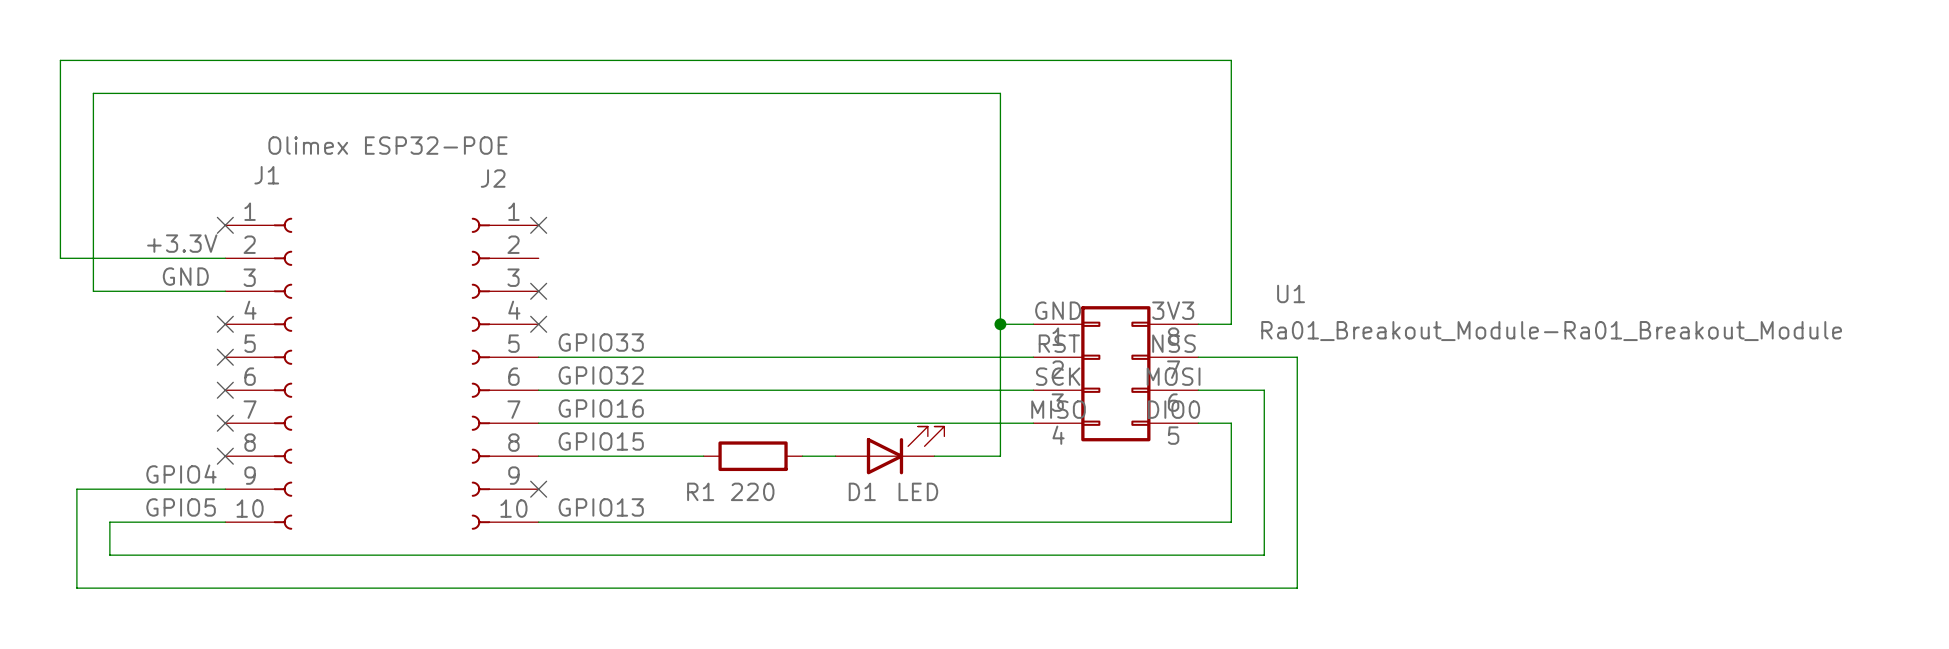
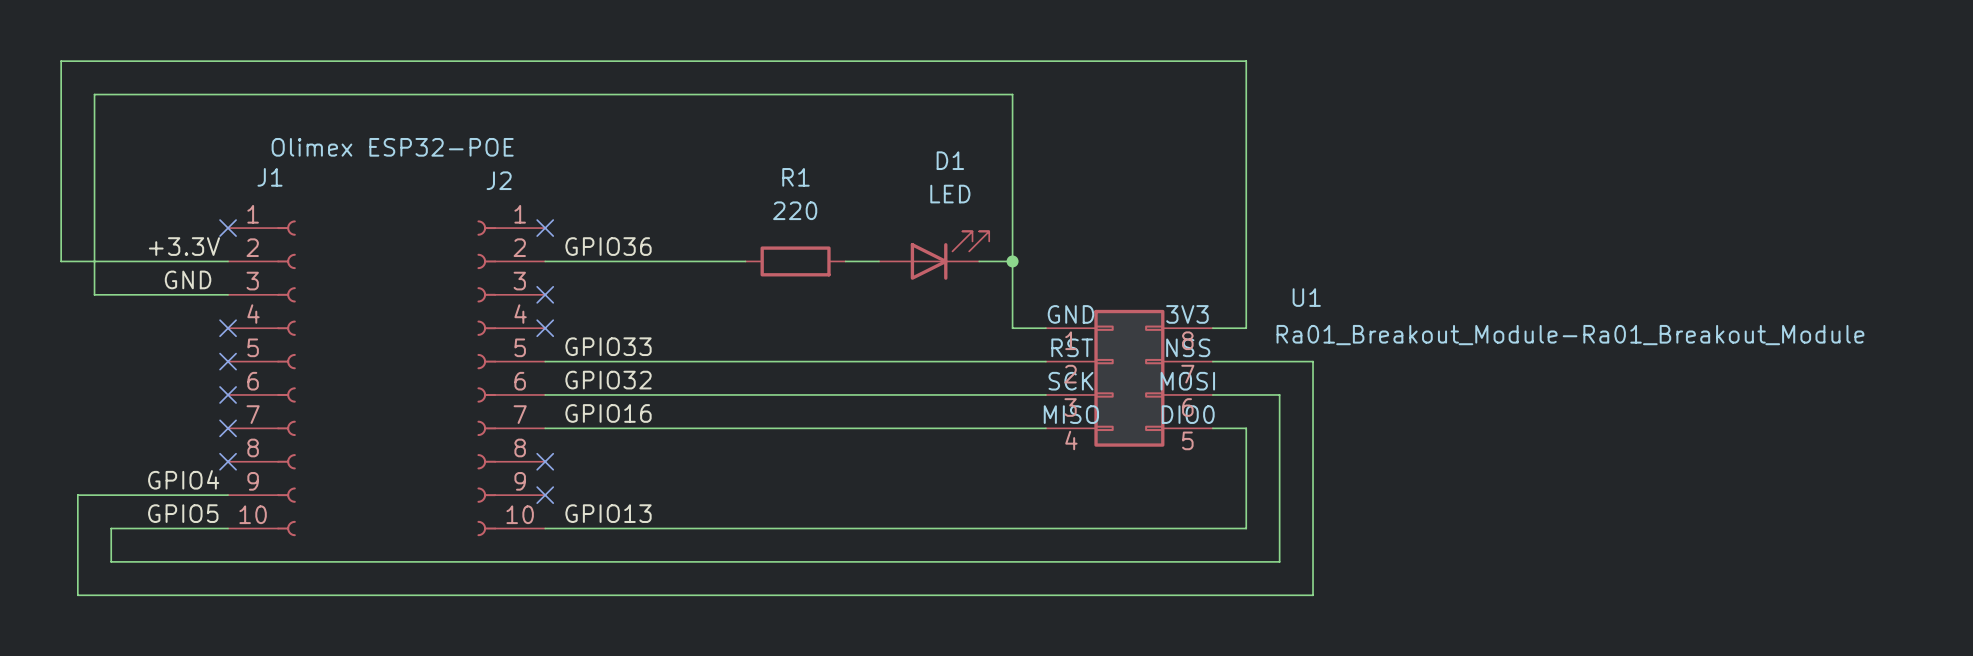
label: none -> GPIO36 (608, 246)
wire: none -> (545, 261) (745, 261)
wire: none -> (979, 261) (1012, 261)
wire: (1000, 324) (1000, 456) (934, 456) -> none
junction position: (1000, 324) -> (1012, 261)
label: GPIO15 (601, 441) -> none
D1 position: (889, 450) -> (934, 255)
wire: (538, 456) (703, 456) -> none
no-connect mark: none -> (545, 461)
R1 position: (753, 456) -> (795, 261)
wire: (802, 456) (835, 456) -> (845, 261) (879, 261)
R1 name position: R1 (700, 491) -> R1 (795, 177)
R1 value position: 220 (752, 491) -> 220 (795, 210)
D1 name position: D1 (862, 491) -> D1 (950, 160)
D1 value position: LED (918, 491) -> LED (950, 194)

